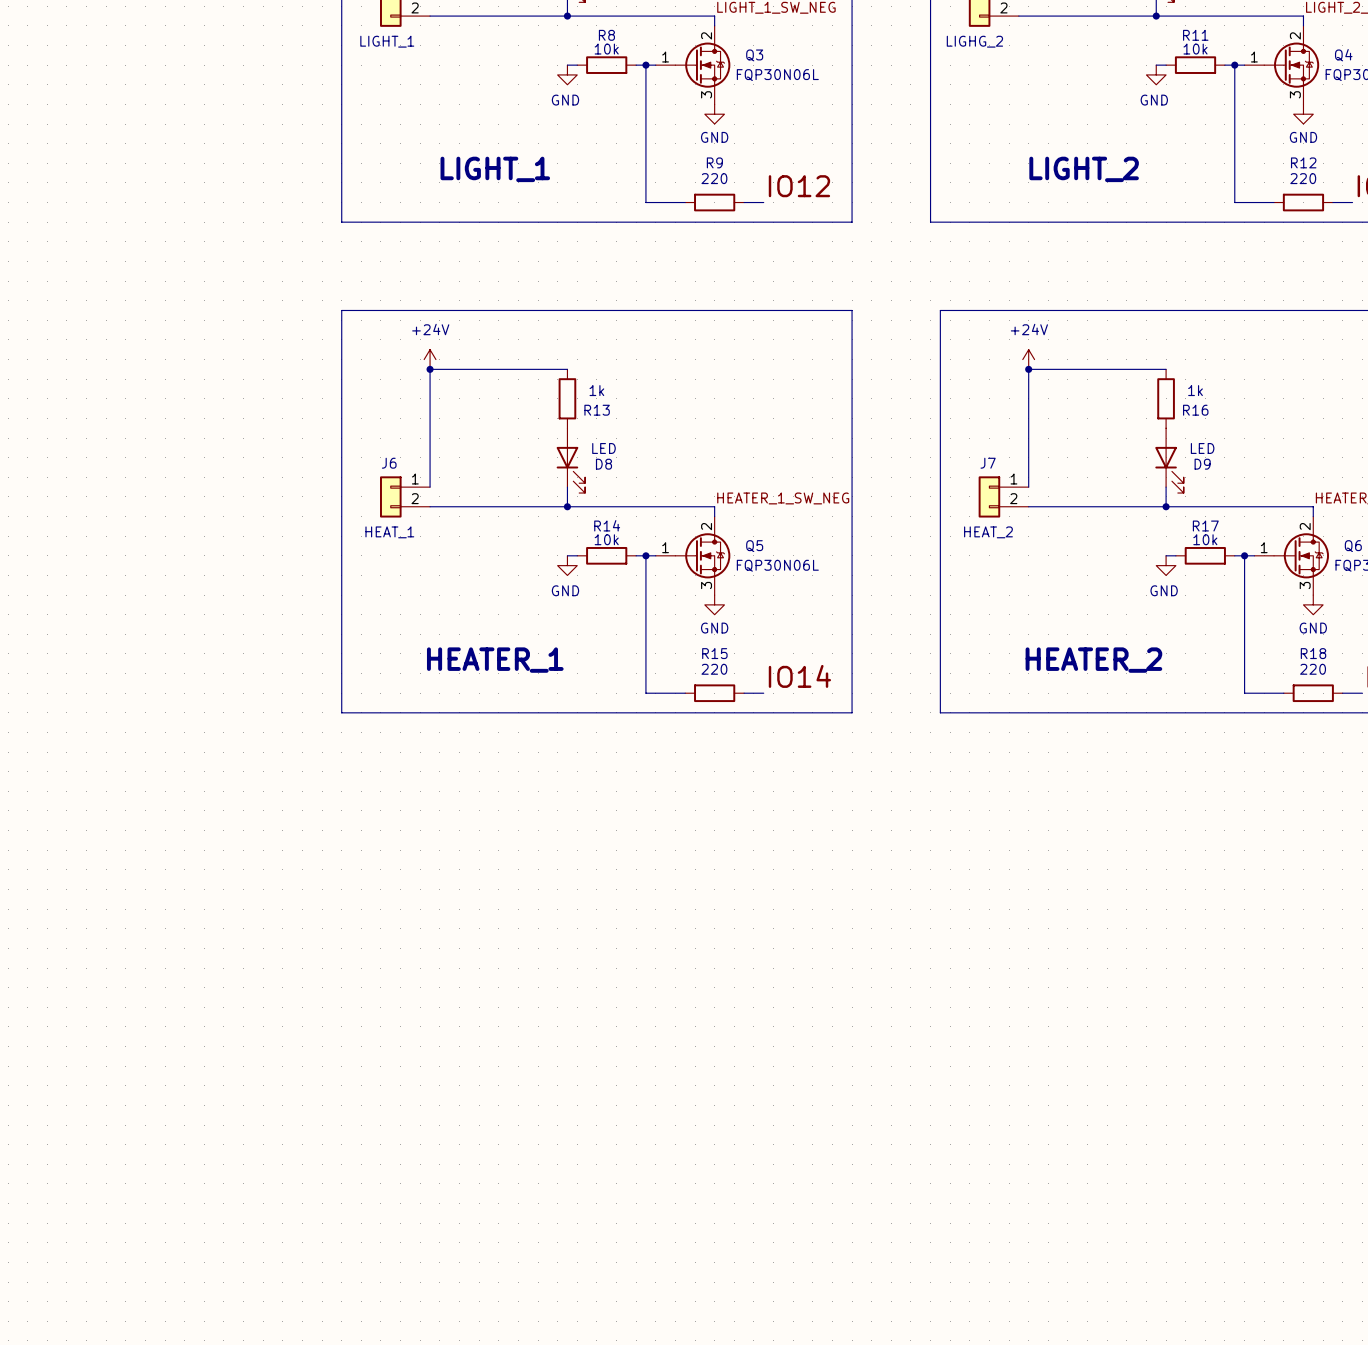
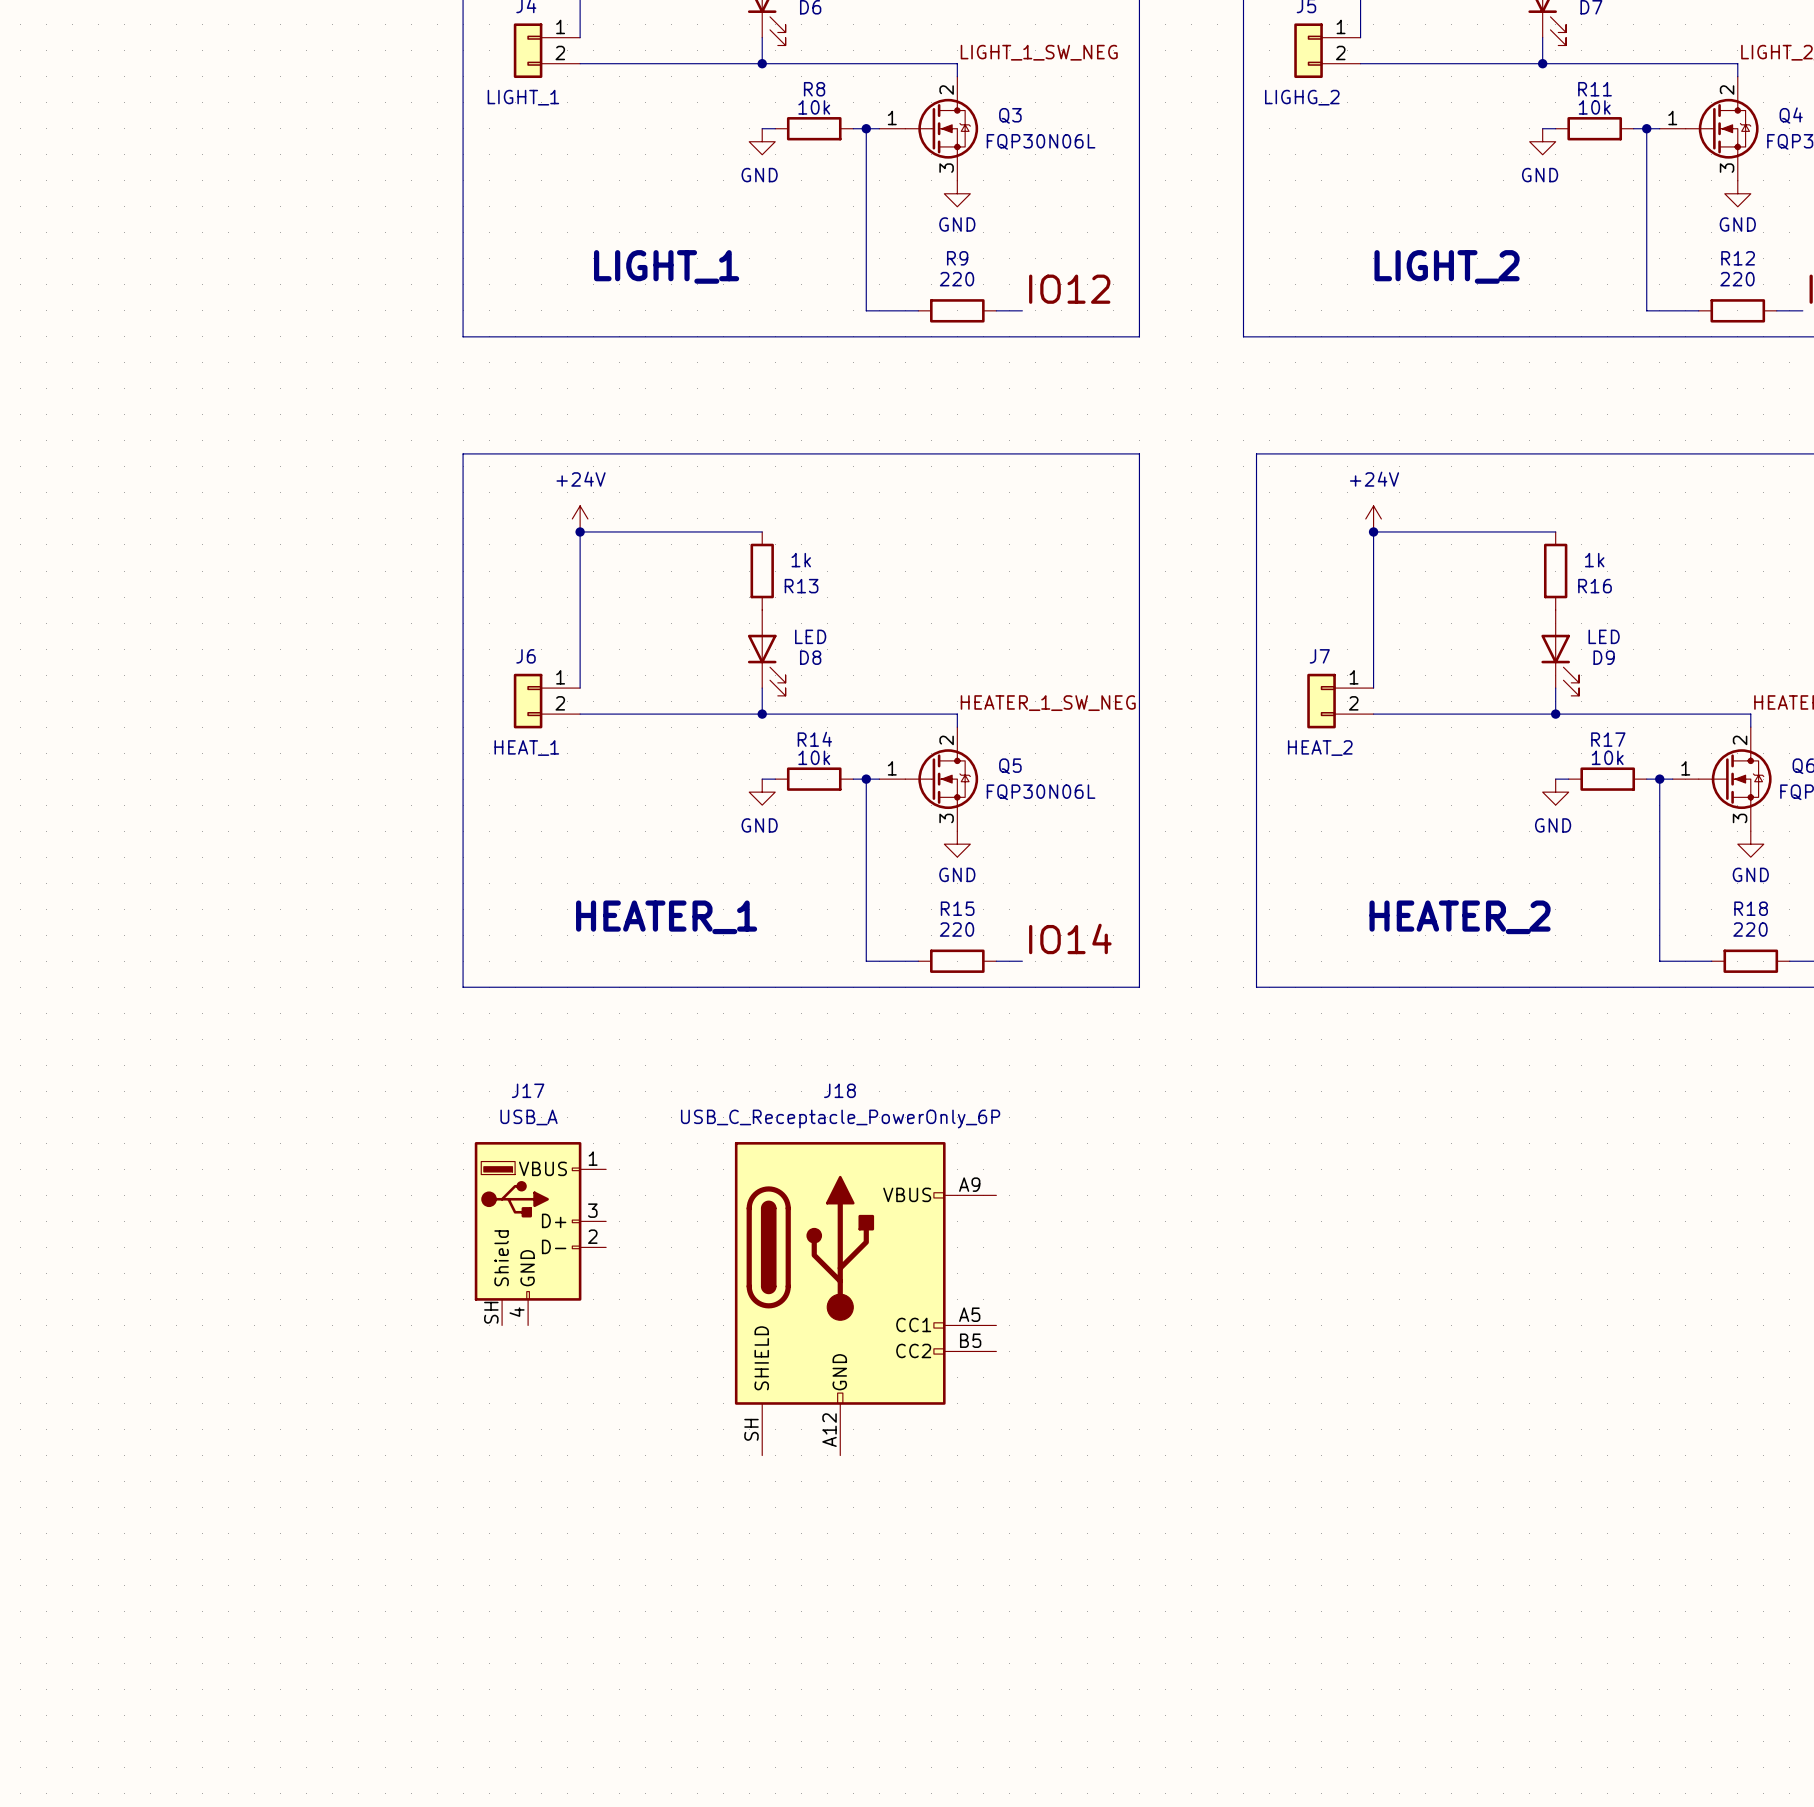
J17: none -> USB_A (540, 1233)
J18: none -> USB_C_Receptacle_PowerOnly_6P (865, 1298)

